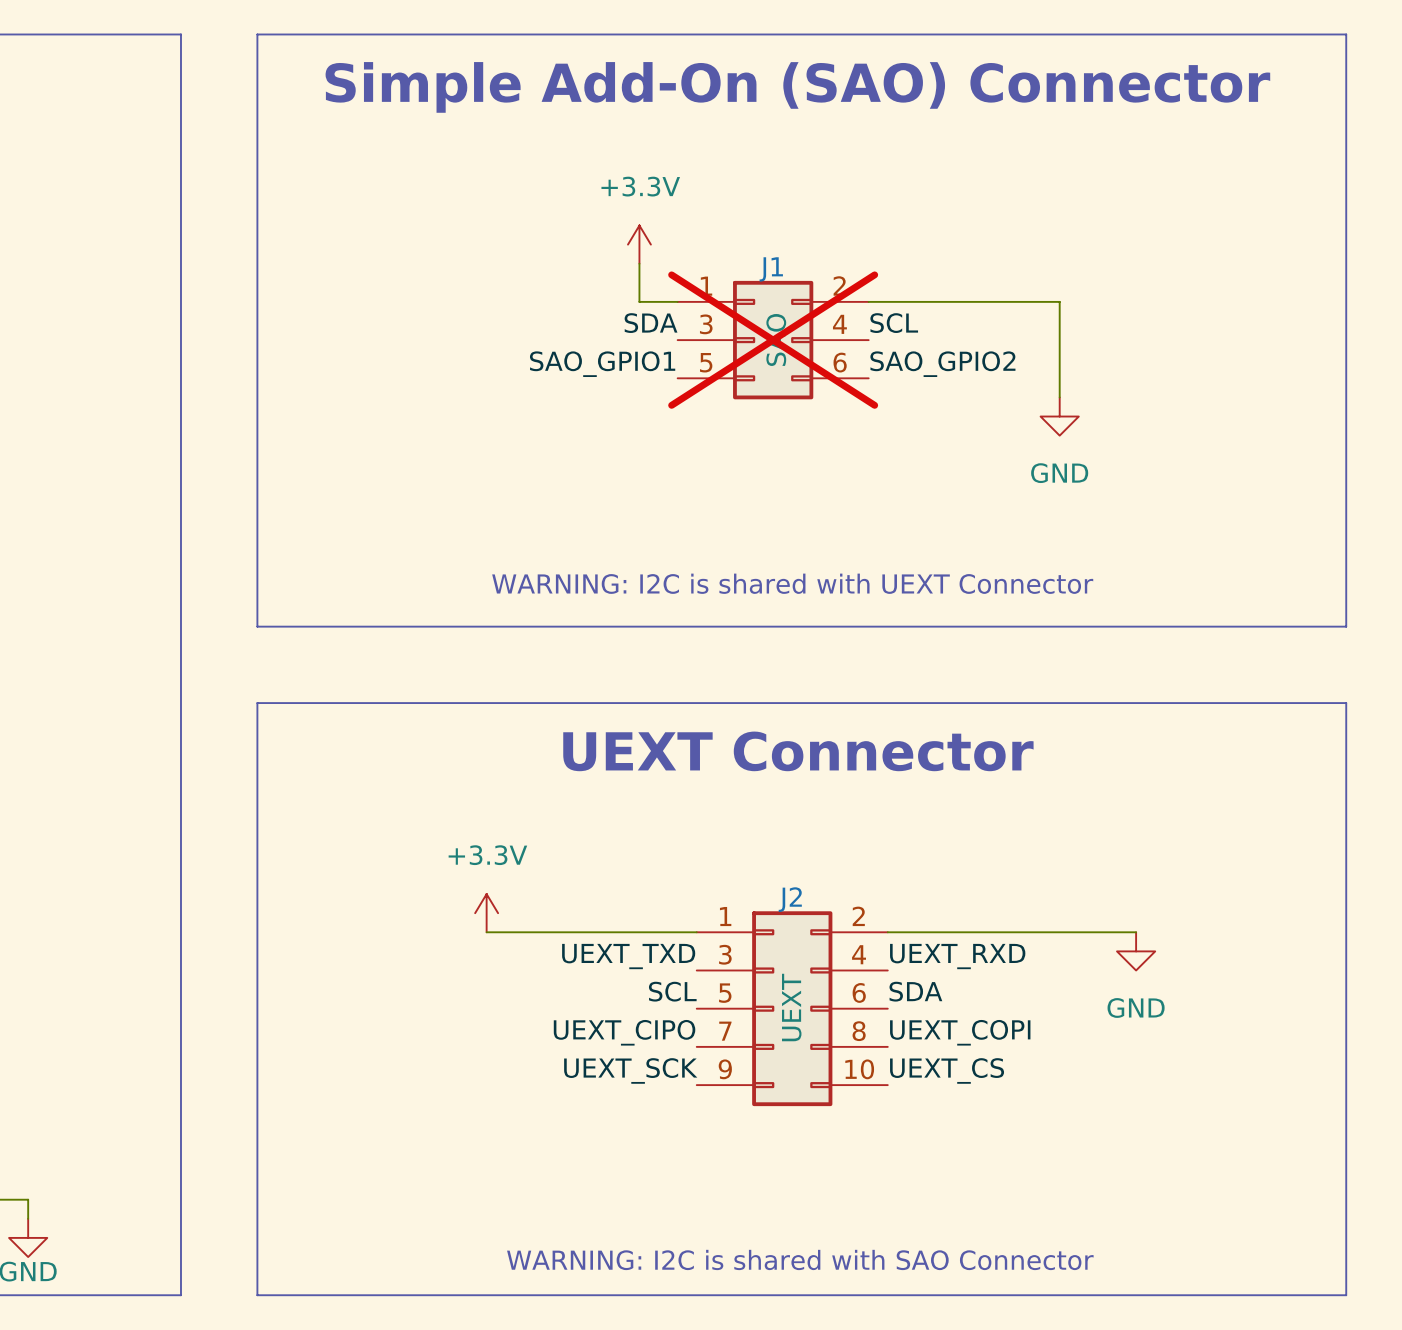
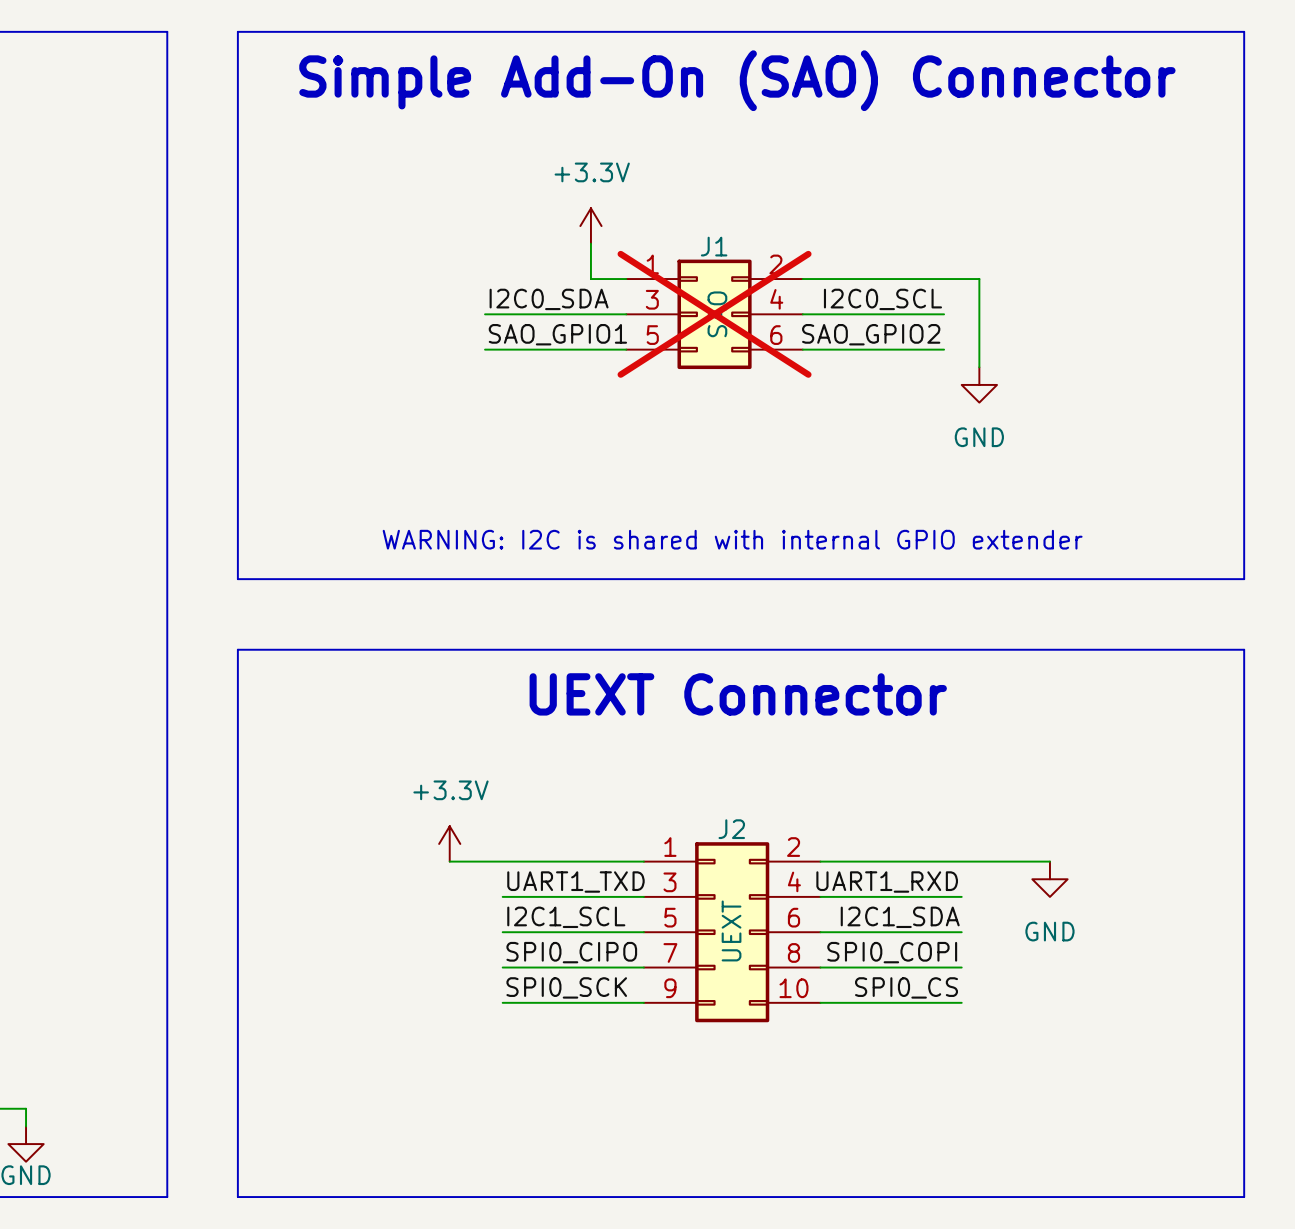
label: SDA (651, 323) -> none
label: SCL (894, 323) -> none
label: none -> I2C0_SDA (549, 299)
label: none -> I2C0_SCL (882, 299)
wire: none -> (485, 314) (626, 314)
wire: none -> (802, 314) (944, 314)
label position: SAO_GPIO1 (602, 364) -> SAO_GPIO1 (557, 334)
label position: SAO_GPIO2 (942, 364) -> SAO_GPIO2 (871, 334)
wire: none -> (485, 349) (626, 349)
wire: none -> (802, 349) (944, 349)
text: WARNING: I2C is shared with UEXT Connector (792, 583) -> WARNING: I2C is shared with internal GPIO extender (732, 539)
label: UEXT_TXD (628, 956) -> UART1_TXD (575, 882)
label: UEXT_RXD (957, 956) -> UART1_RXD (887, 882)
wire: none -> (502, 896) (643, 896)
wire: none -> (820, 896) (961, 896)
label: SCL (672, 991) -> none
label: SDA (915, 991) -> none
label: none -> I2C1_SCL (566, 917)
label: none -> I2C1_SDA (900, 917)
wire: none -> (502, 932) (643, 932)
wire: none -> (820, 932) (961, 932)
label: none -> SPI0_CIPO (571, 952)
label: UEXT_CIPO (624, 1032) -> none
label: UEXT_COPI (960, 1032) -> none
label: none -> SPI0_COPI (892, 952)
wire: none -> (502, 967) (643, 967)
wire: none -> (820, 967) (961, 967)
label: none -> SPI0_SCK (566, 987)
label: UEXT_SCK (630, 1070) -> none
label: UEXT_CS (947, 1070) -> none
label: none -> SPI0_CS (906, 987)
wire: none -> (502, 1002) (643, 1002)
wire: none -> (820, 1002) (961, 1002)
text: WARNING: I2C is shared with SAO Connector (800, 1259) -> none

